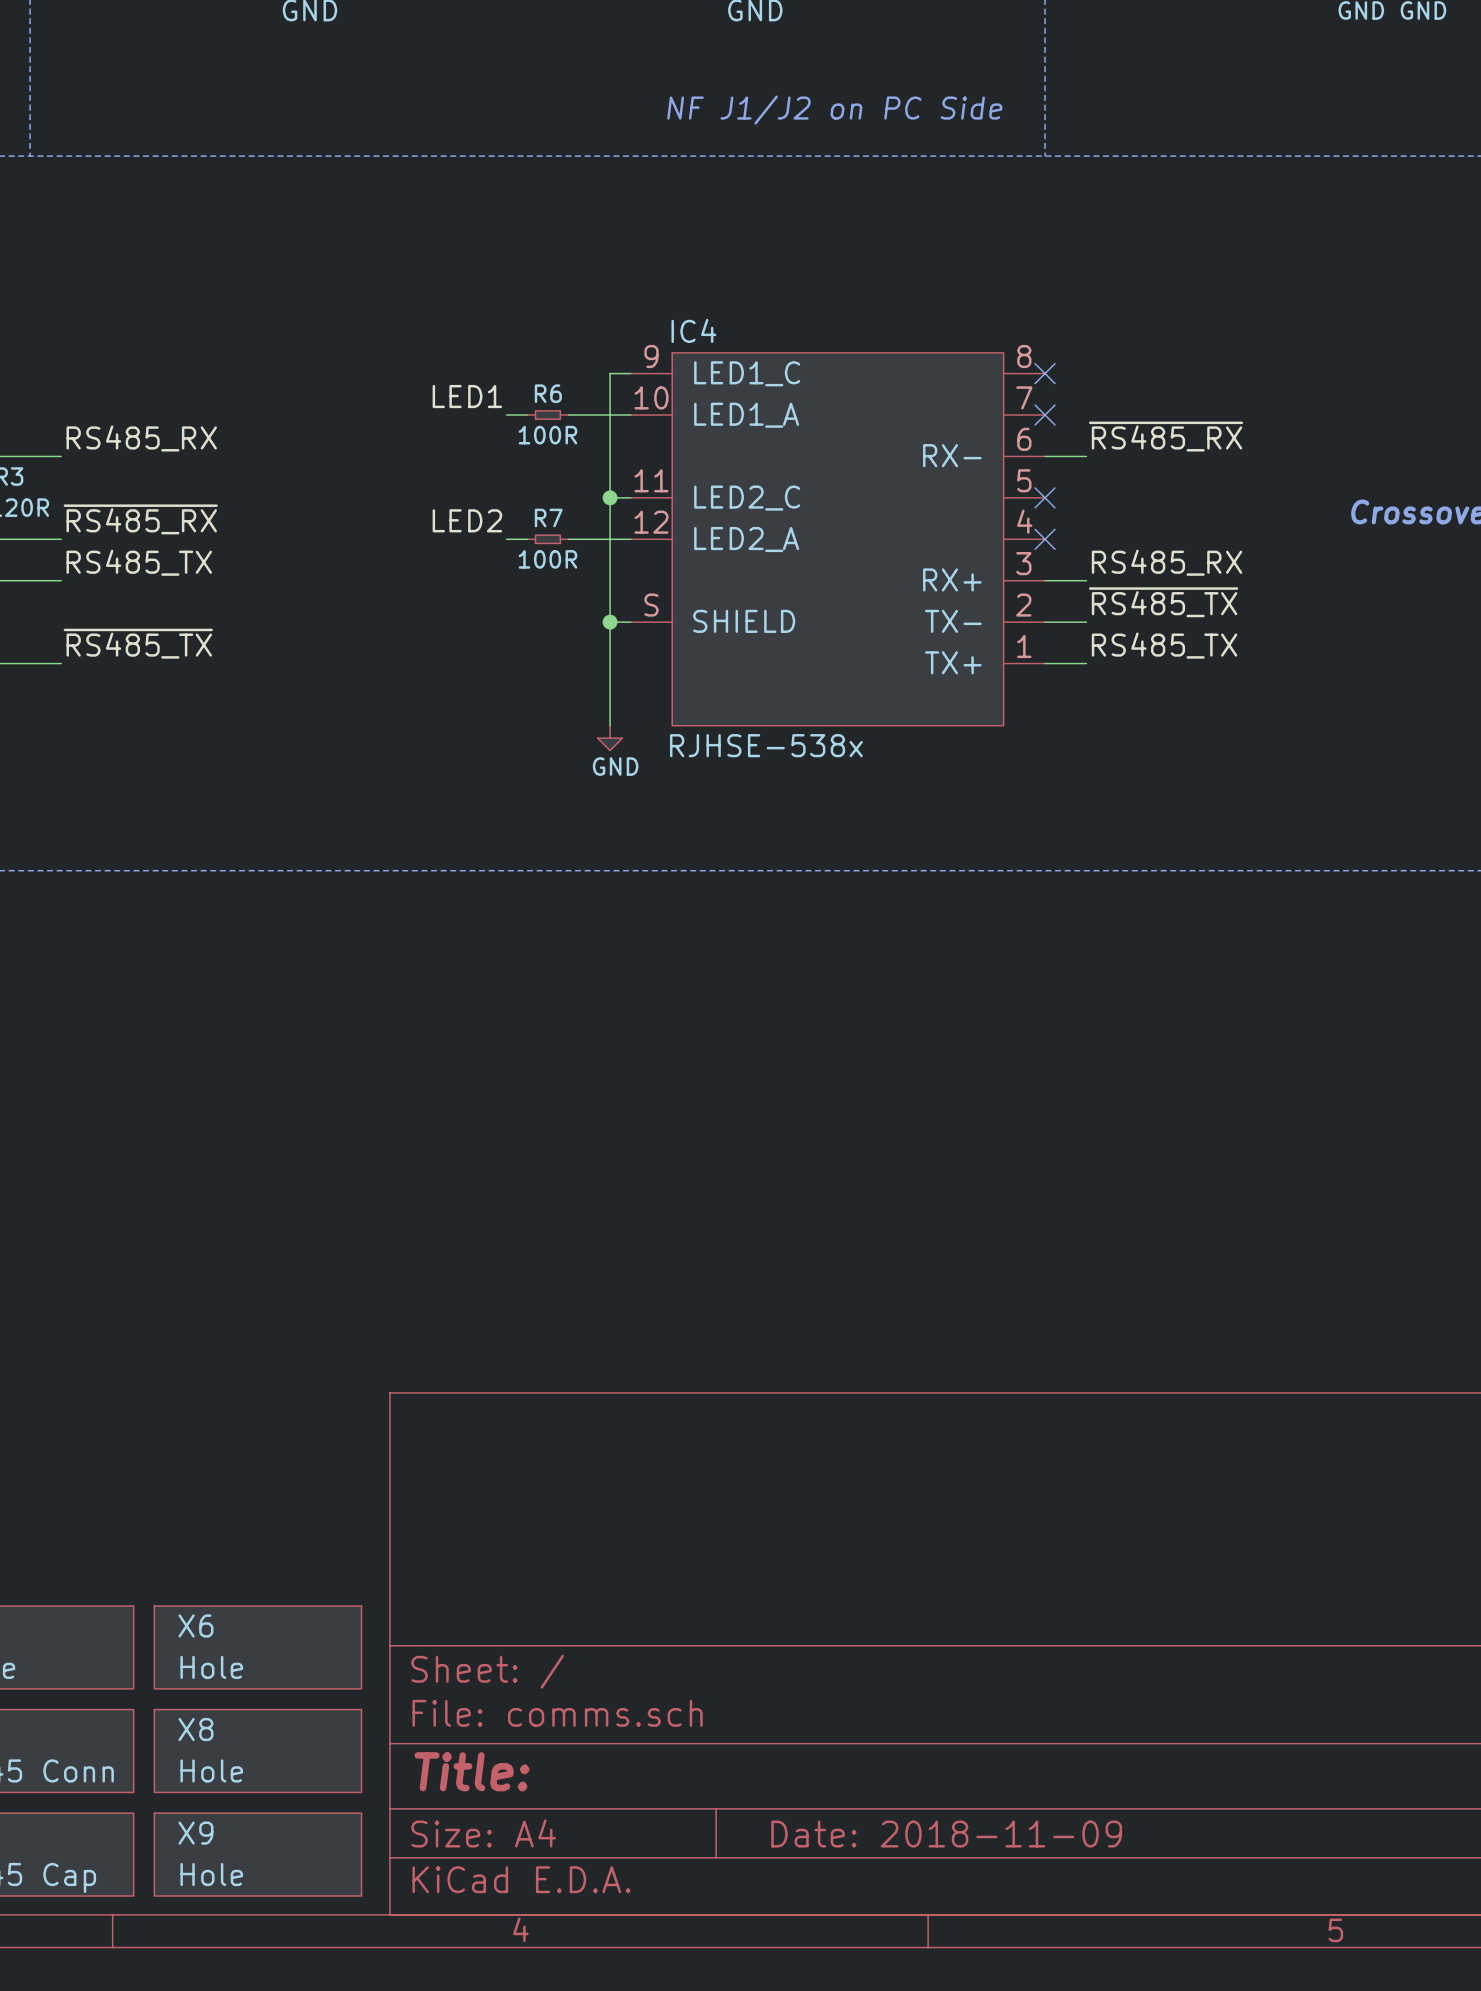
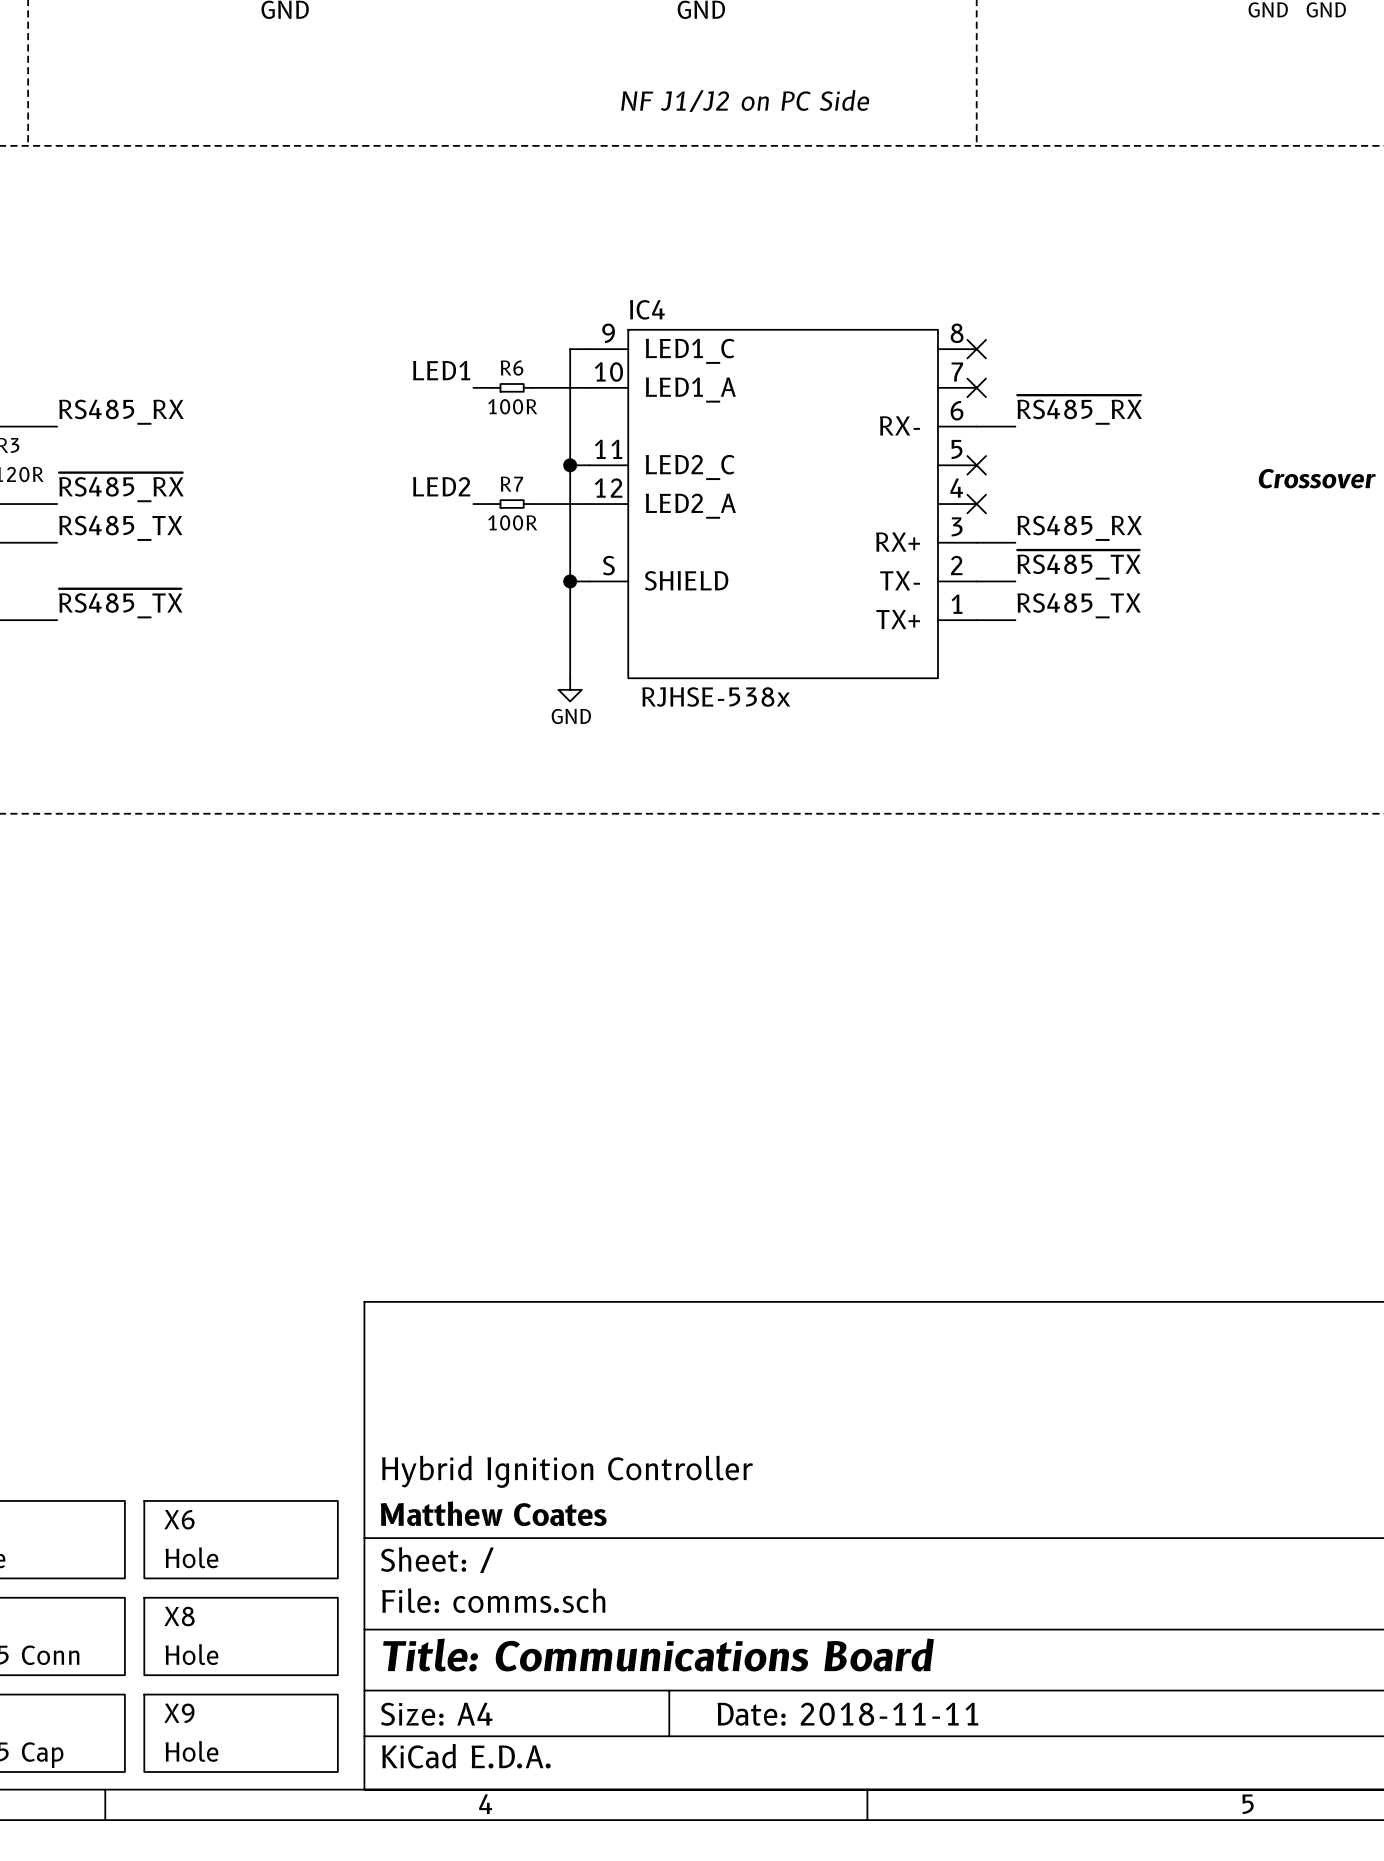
title block: none -> Hybrid Ignition Controller (567, 1471)
title block: none -> Matthew Coates (493, 1513)
title block: Title: (471, 1771) -> Title: Communications Board (658, 1655)
title block: Date: 2018-11-09 (946, 1834) -> Date: 2018-11-11 (847, 1714)

